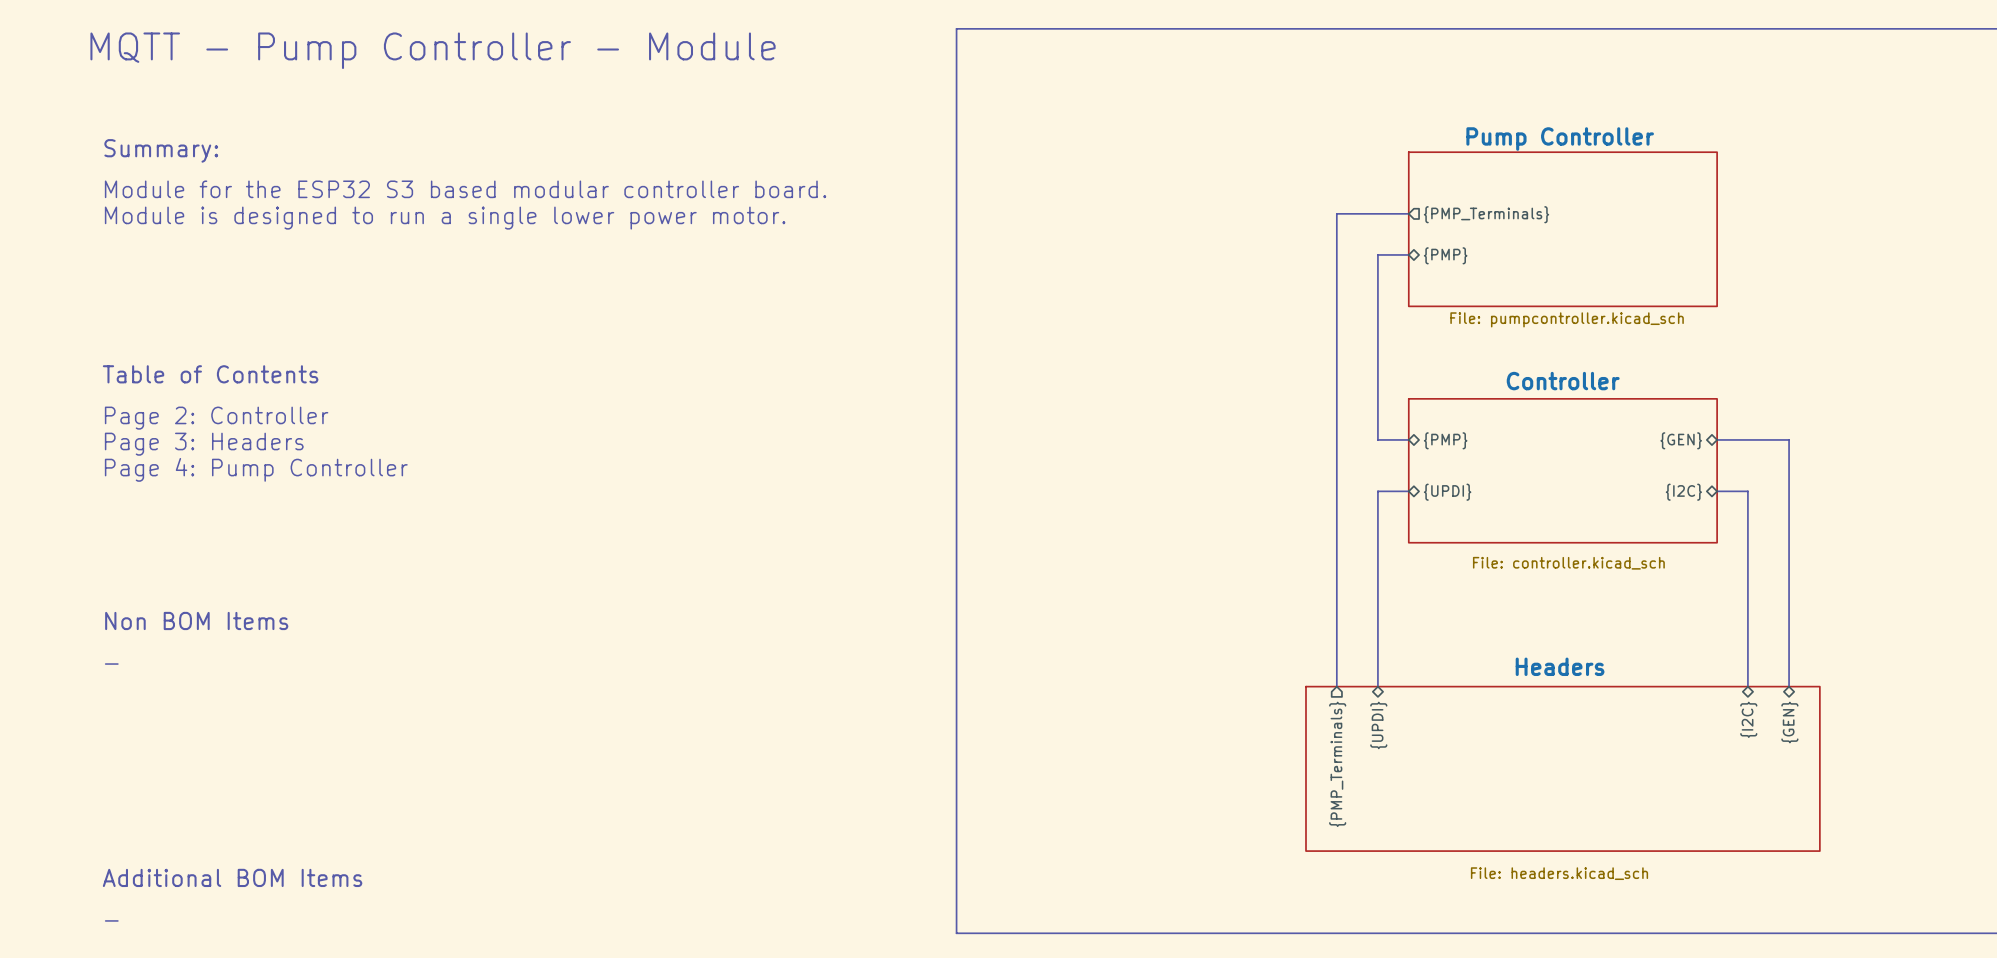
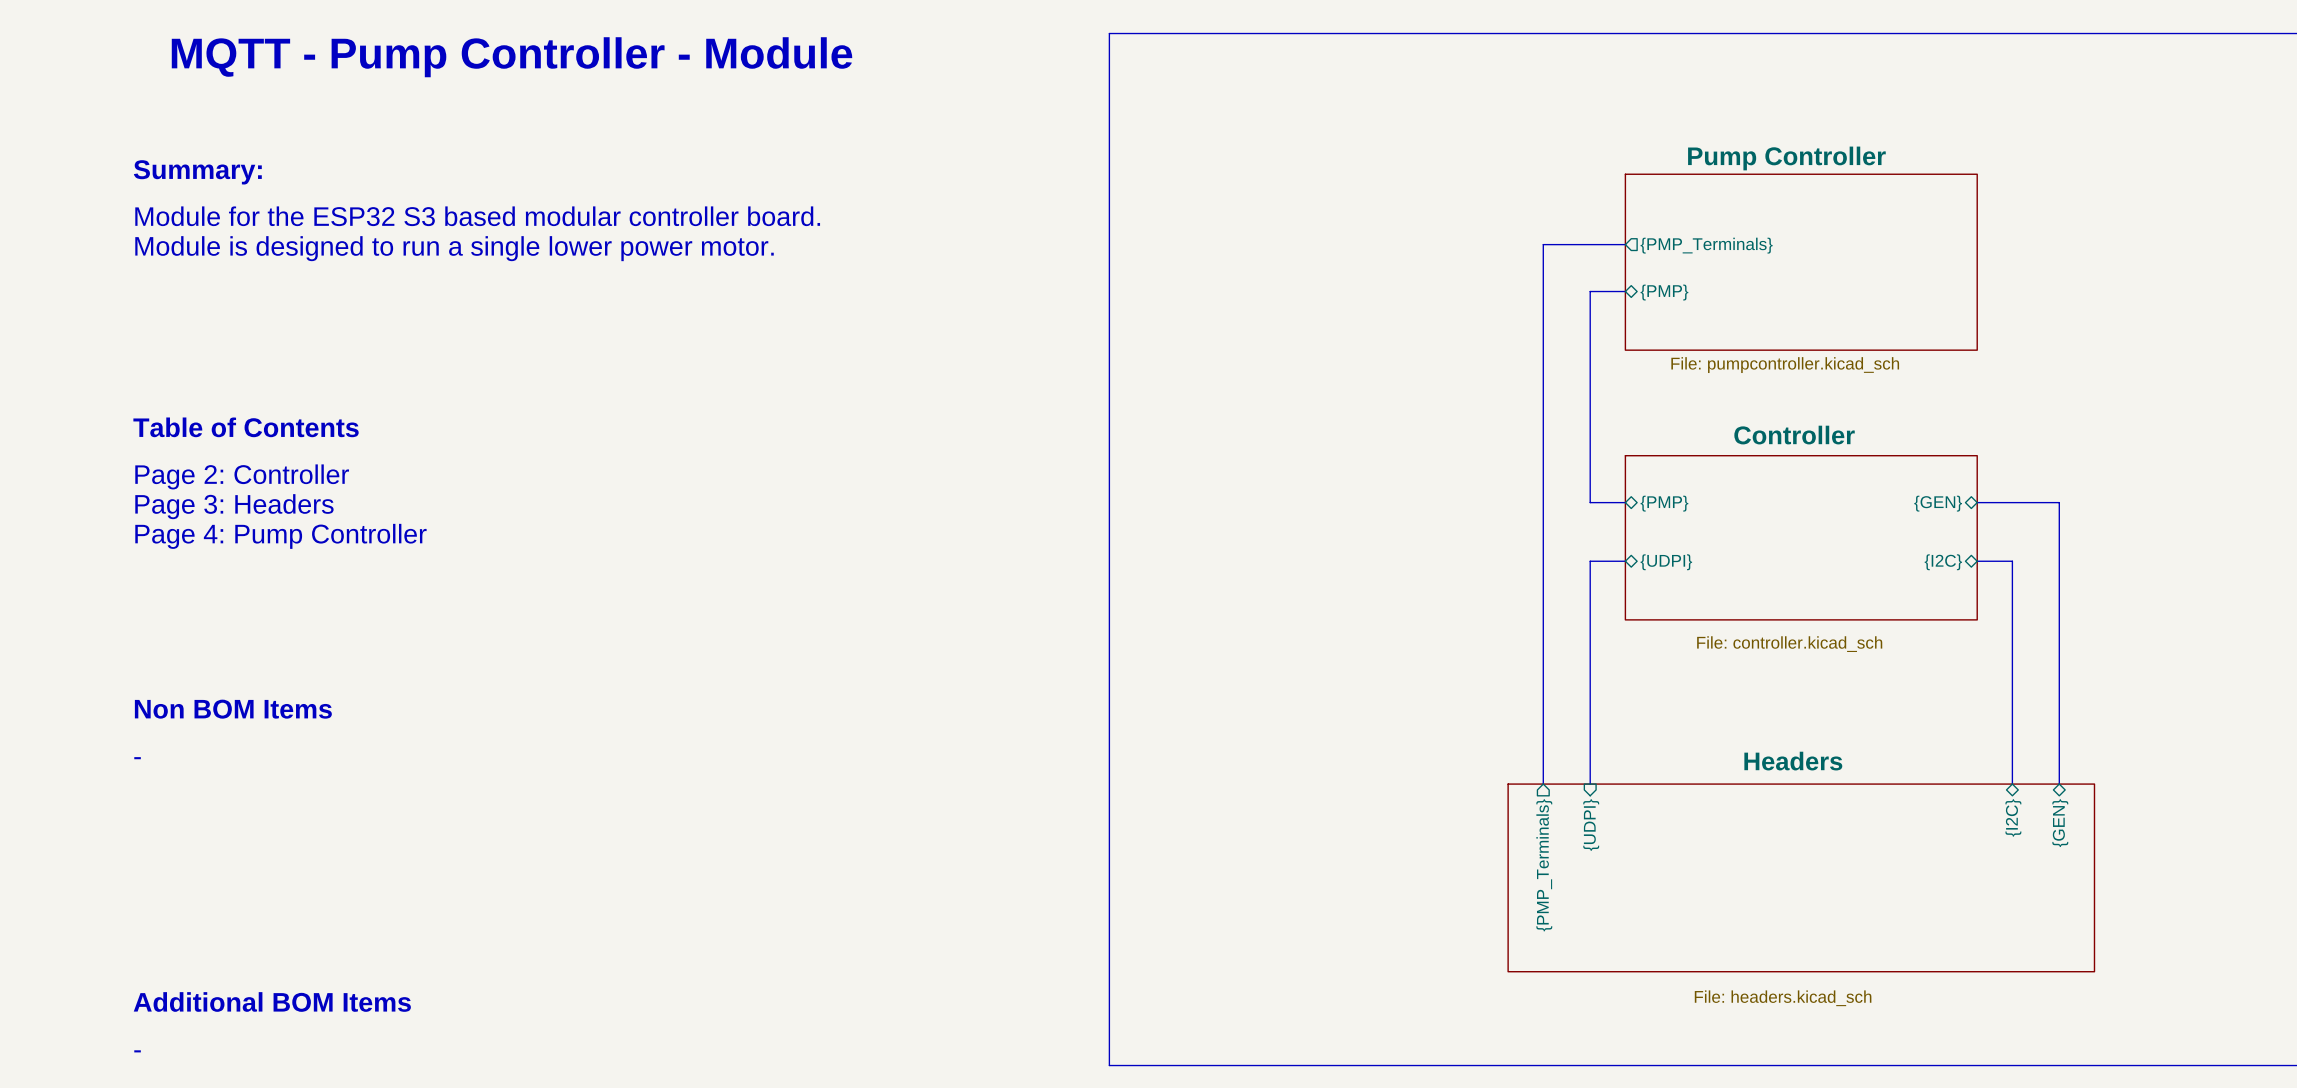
sheet pin: {UPDI} (1447, 492) -> {UDPI} (1666, 562)
sheet pin shape: bidirectional (1378, 725) -> input (1591, 825)
sheet pin: {UPDI} (1378, 725) -> {UDPI} (1591, 825)

